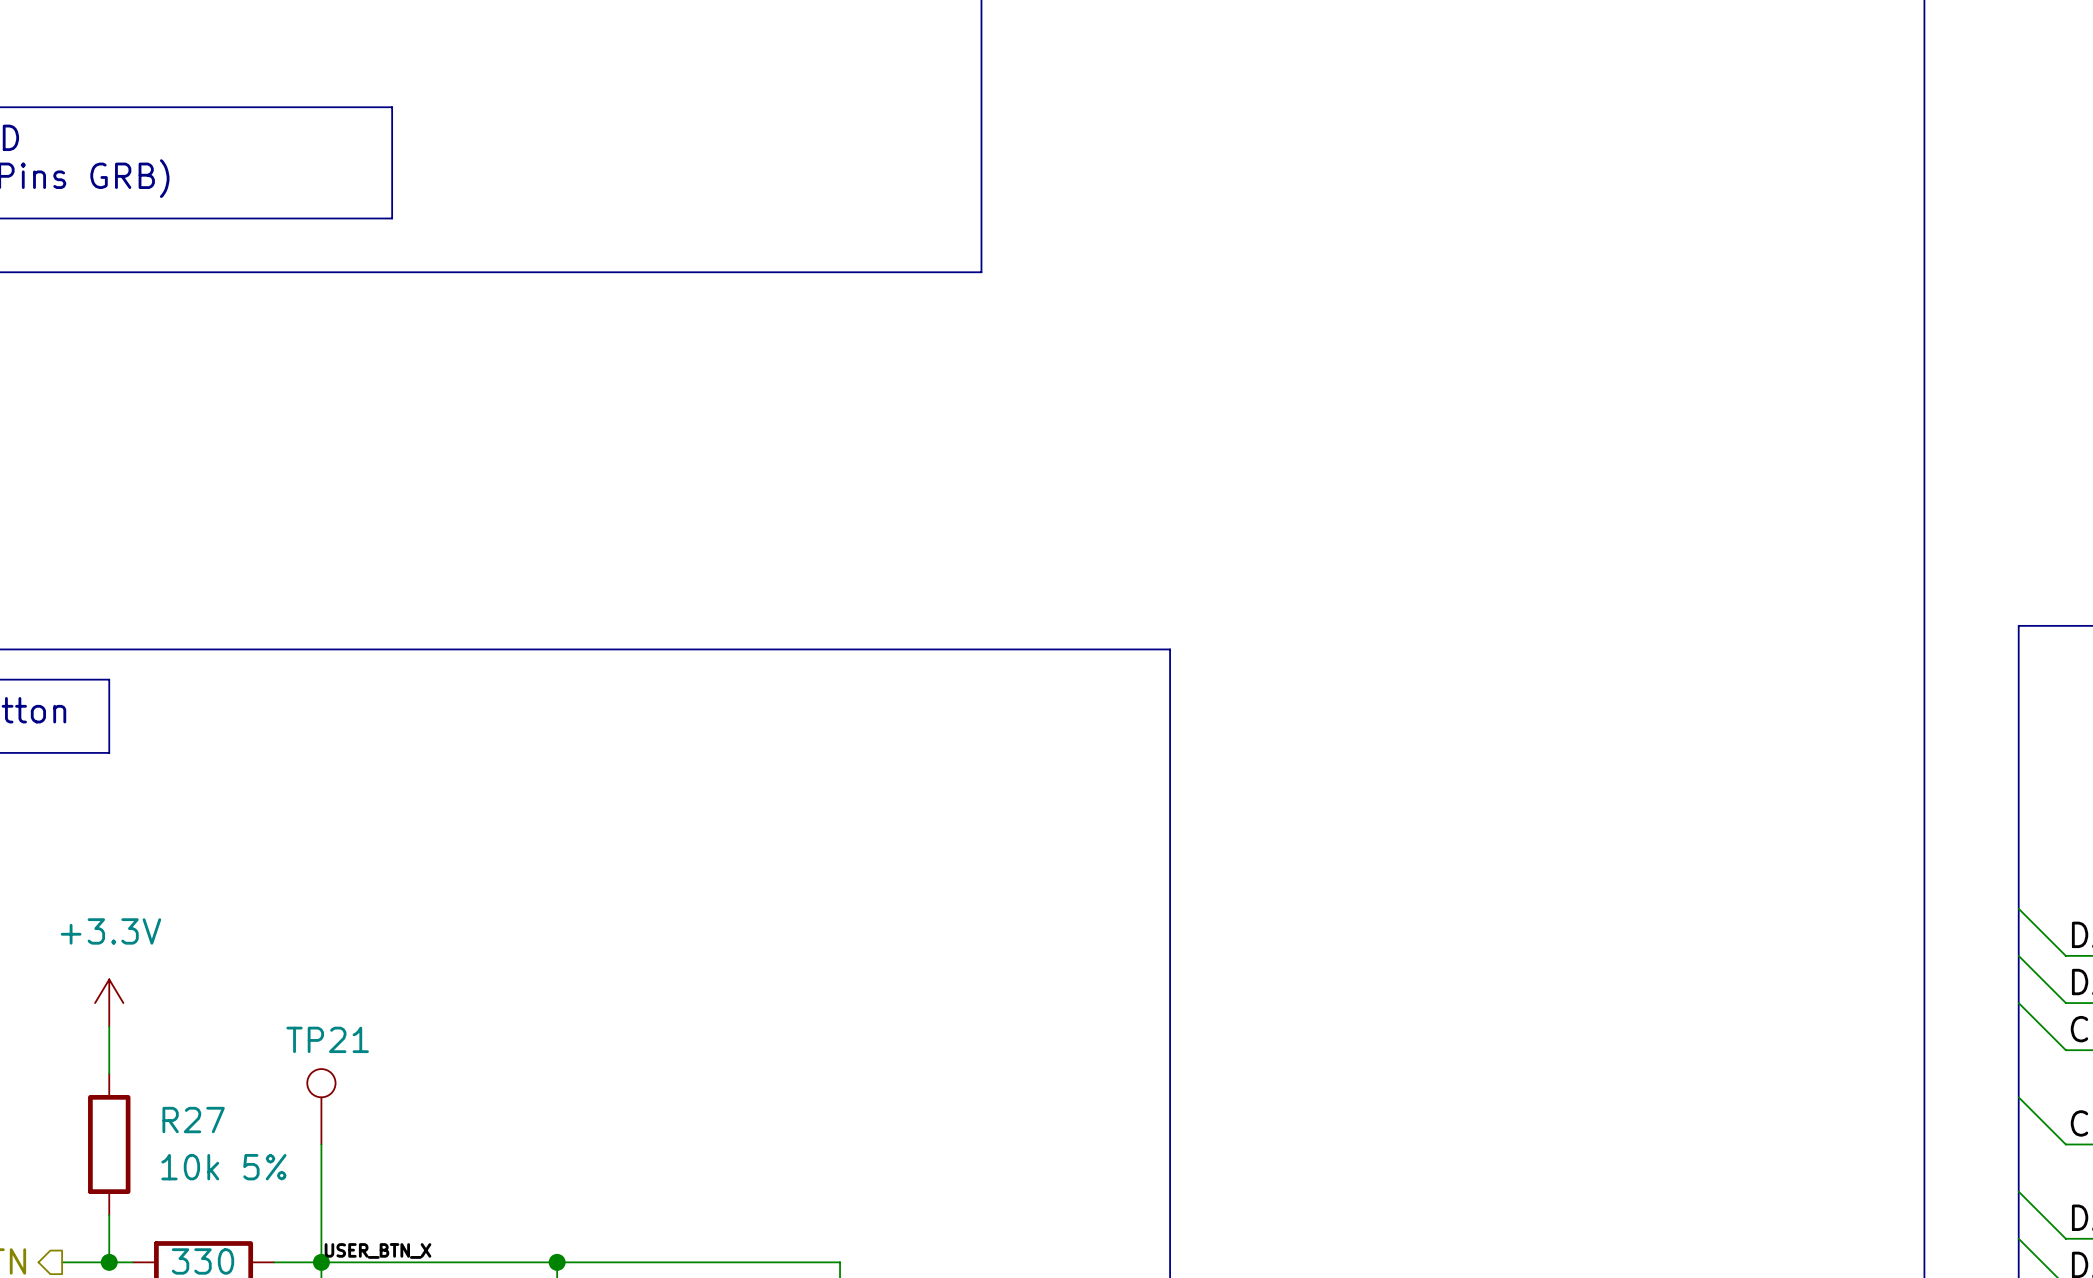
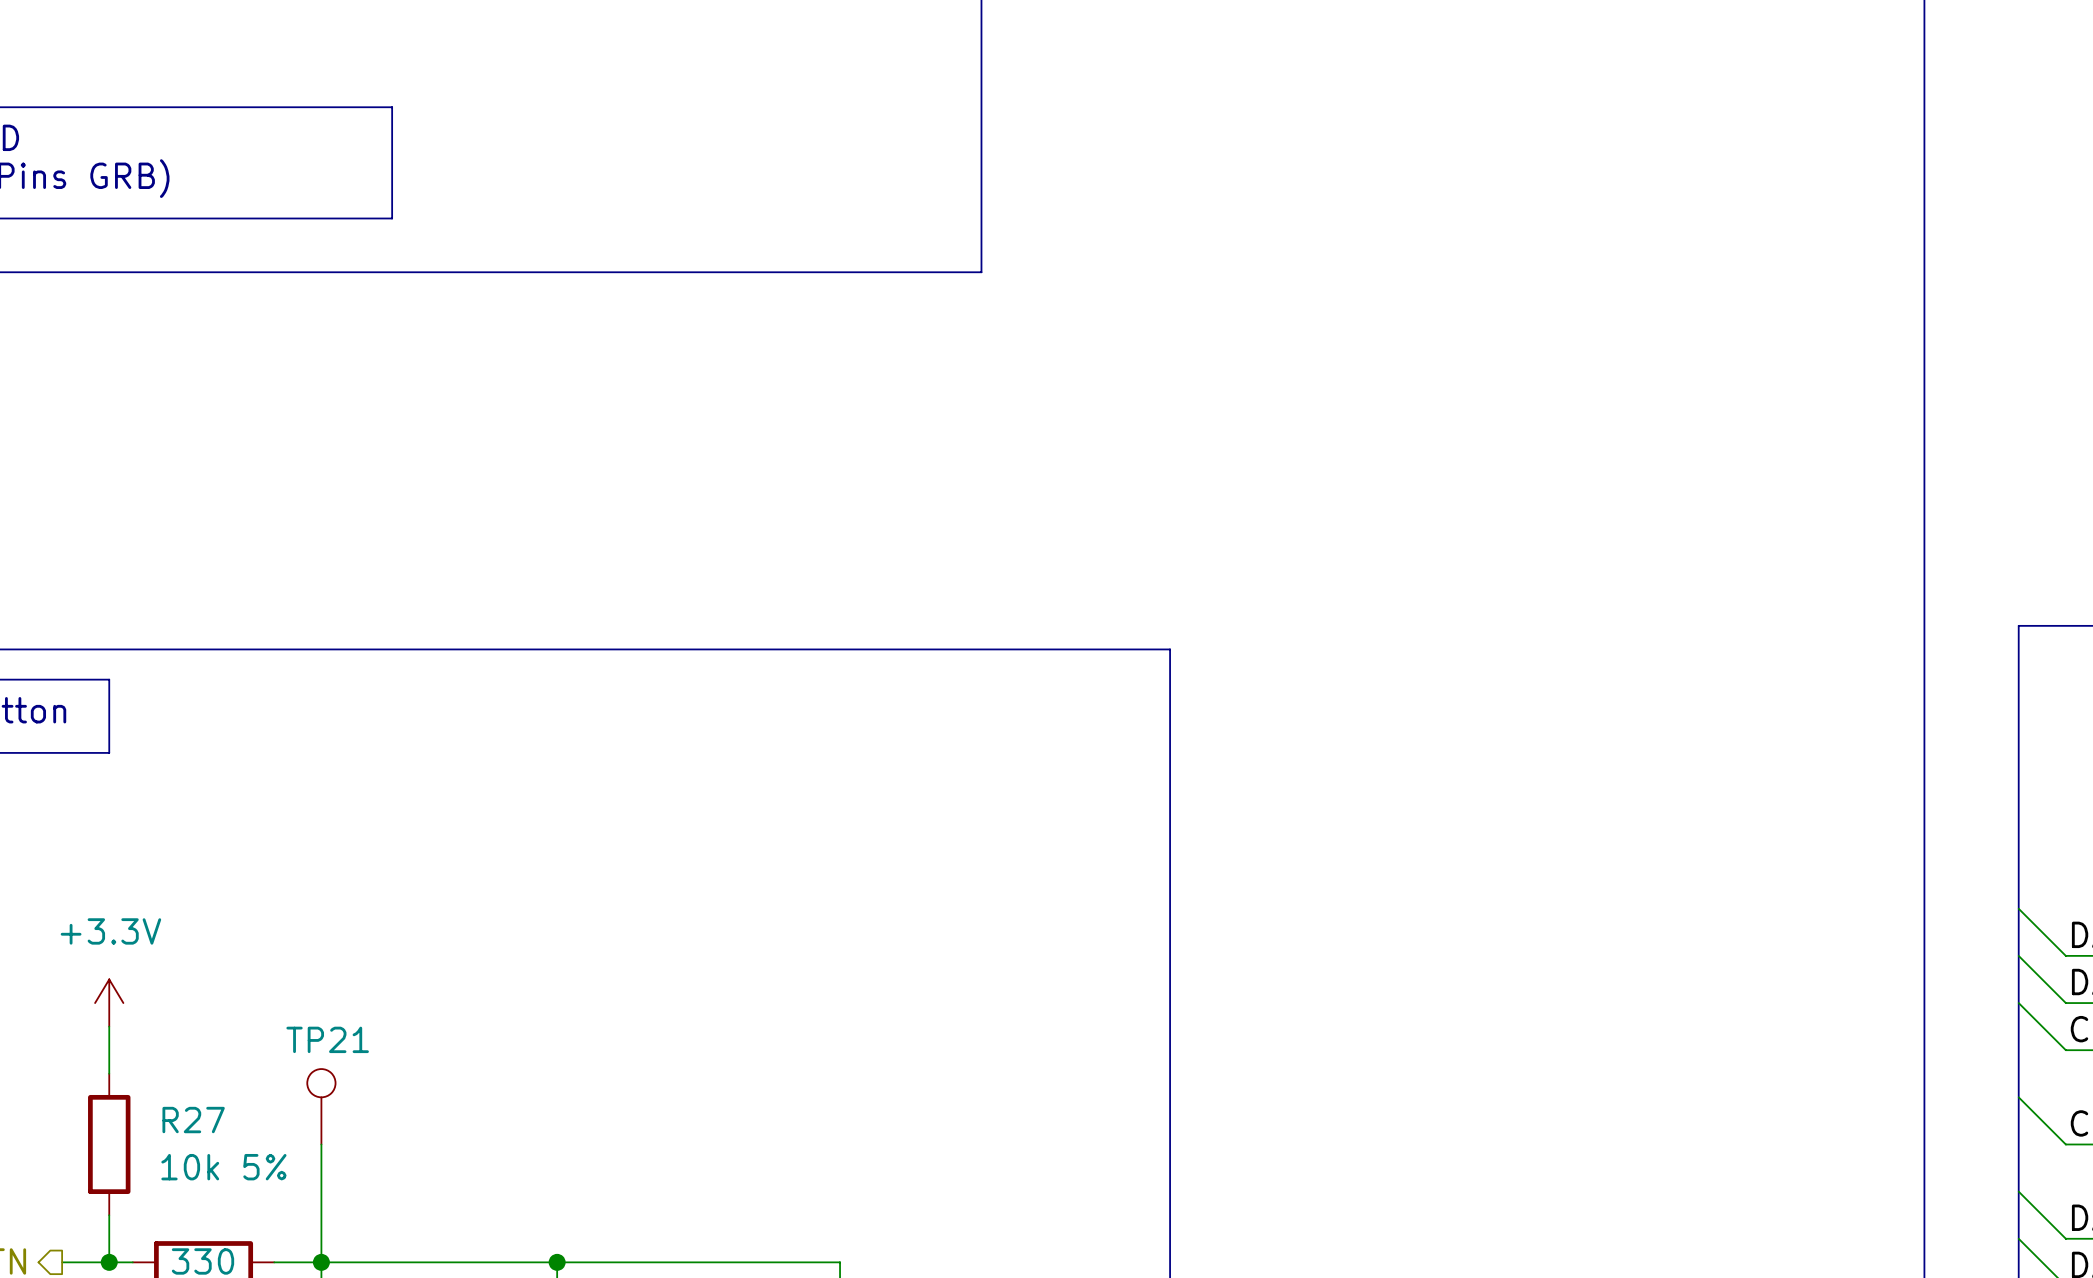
label: USER_BTN_X (377, 1250) -> none

